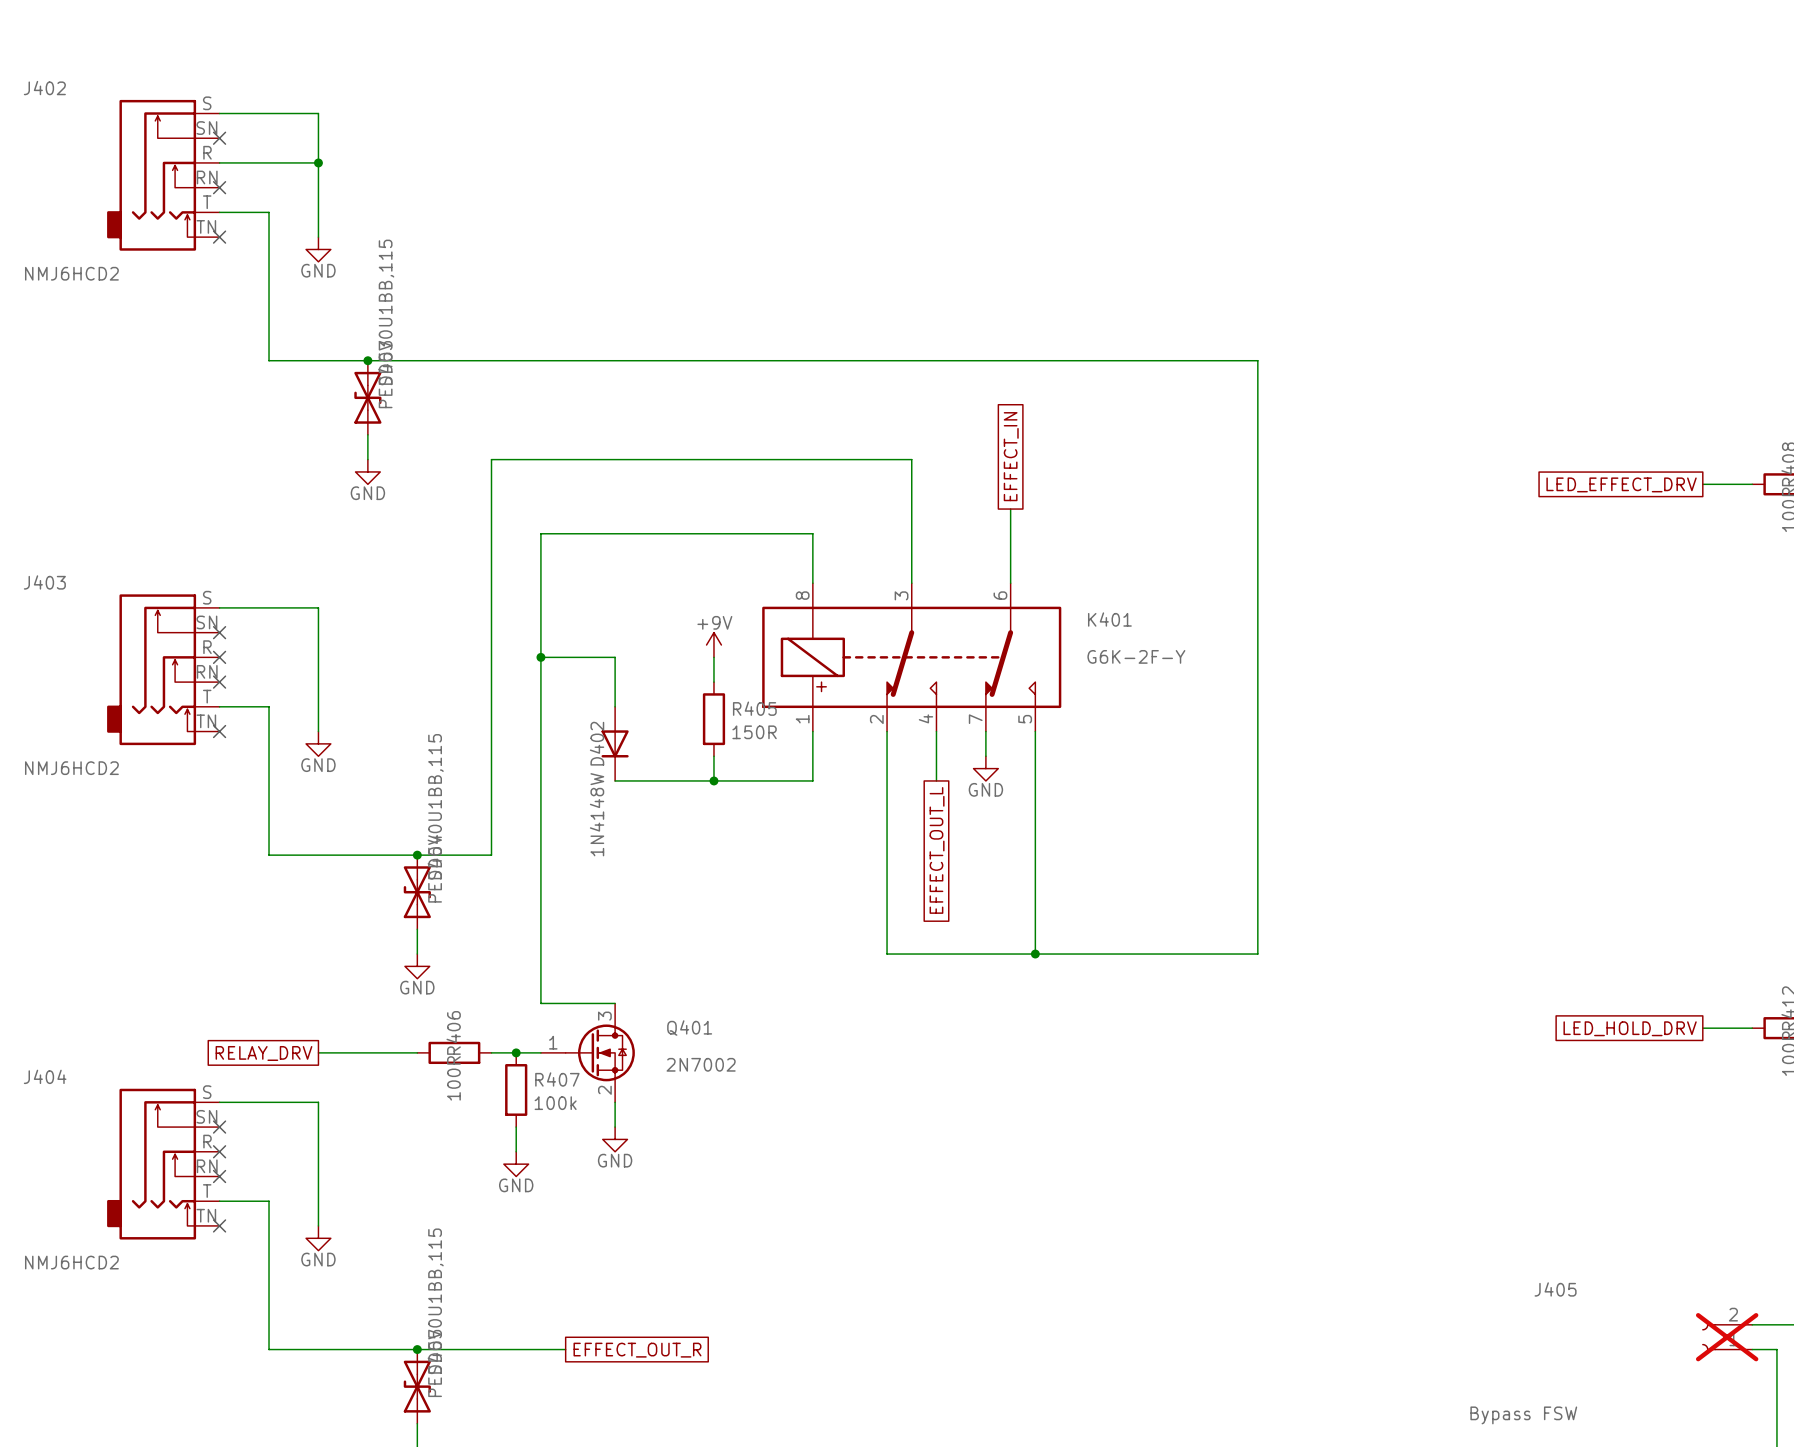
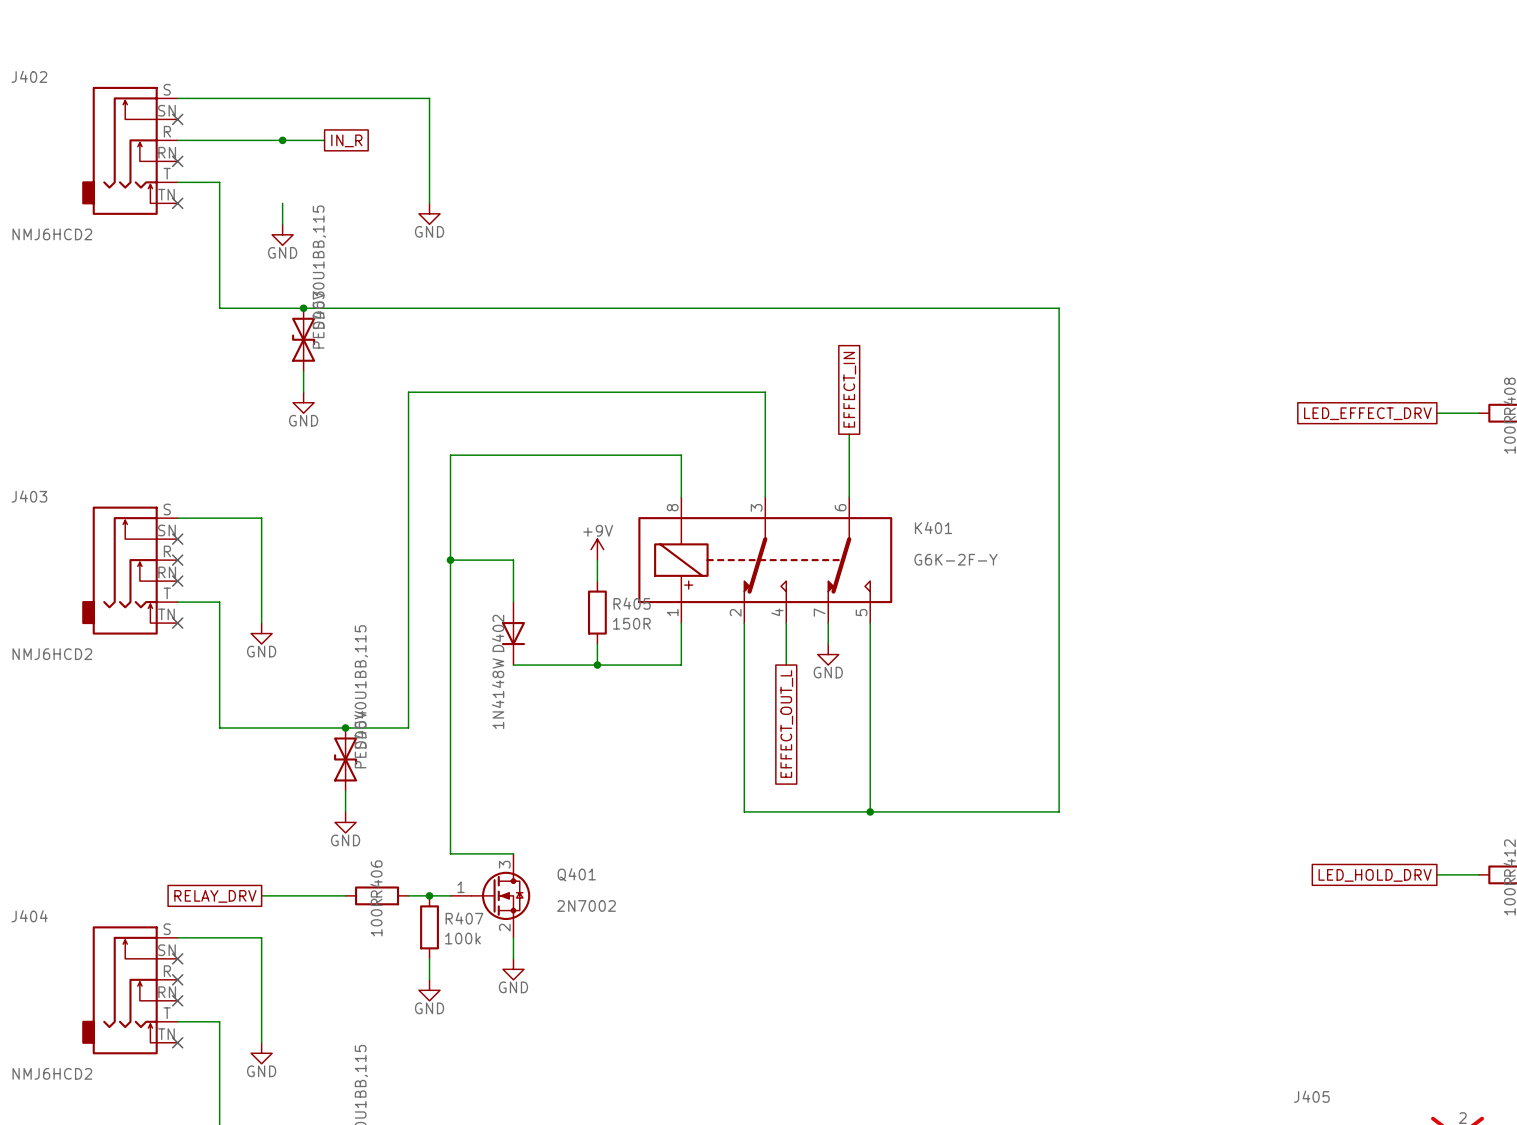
wire: (318, 113) (318, 237) -> (261, 98) (429, 98) (429, 203)
wire: none -> (261, 140) (324, 140)
junction position: (318, 162) -> (282, 140)
global label: none -> IN_R (346, 140)
wire: none -> (282, 203) (282, 224)
power symbol position: GND (318, 249) -> GND (282, 234)
power symbol: none -> GND (429, 213)

